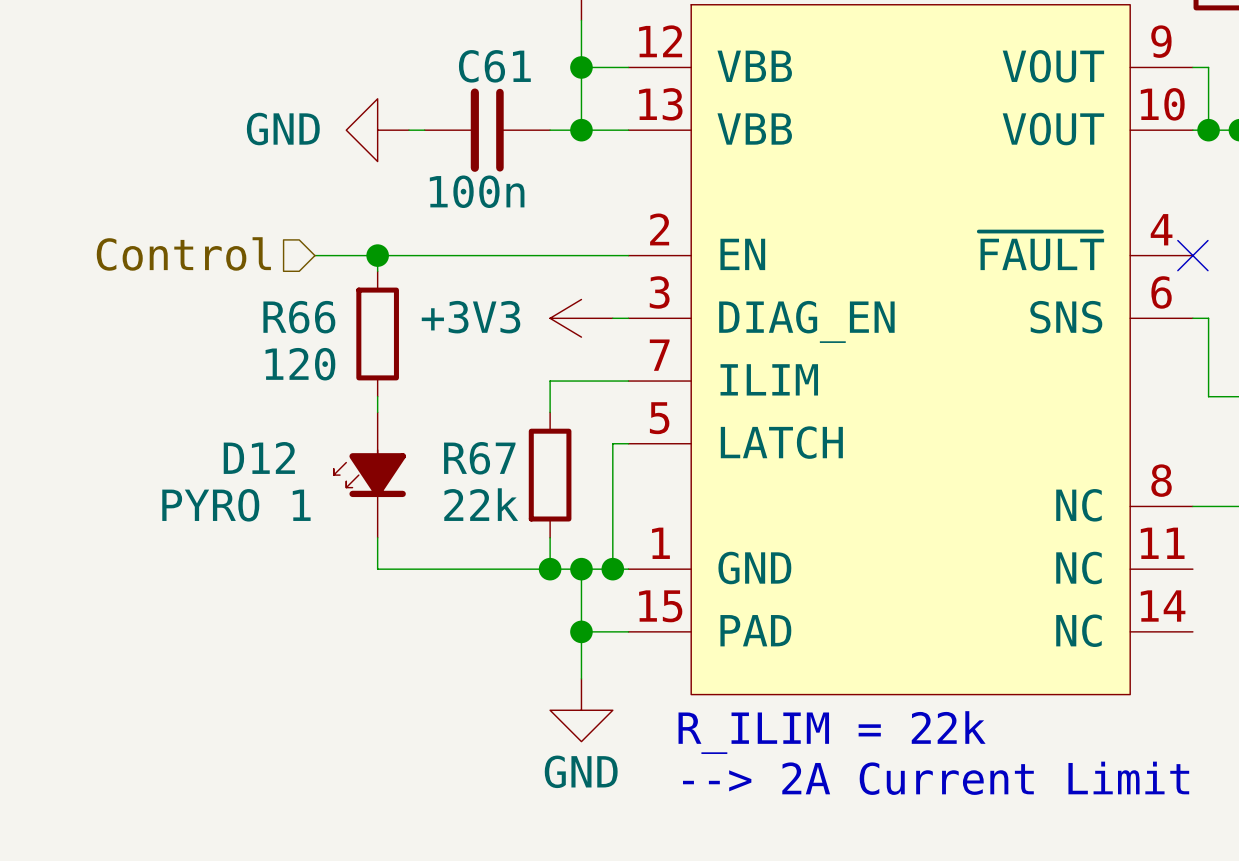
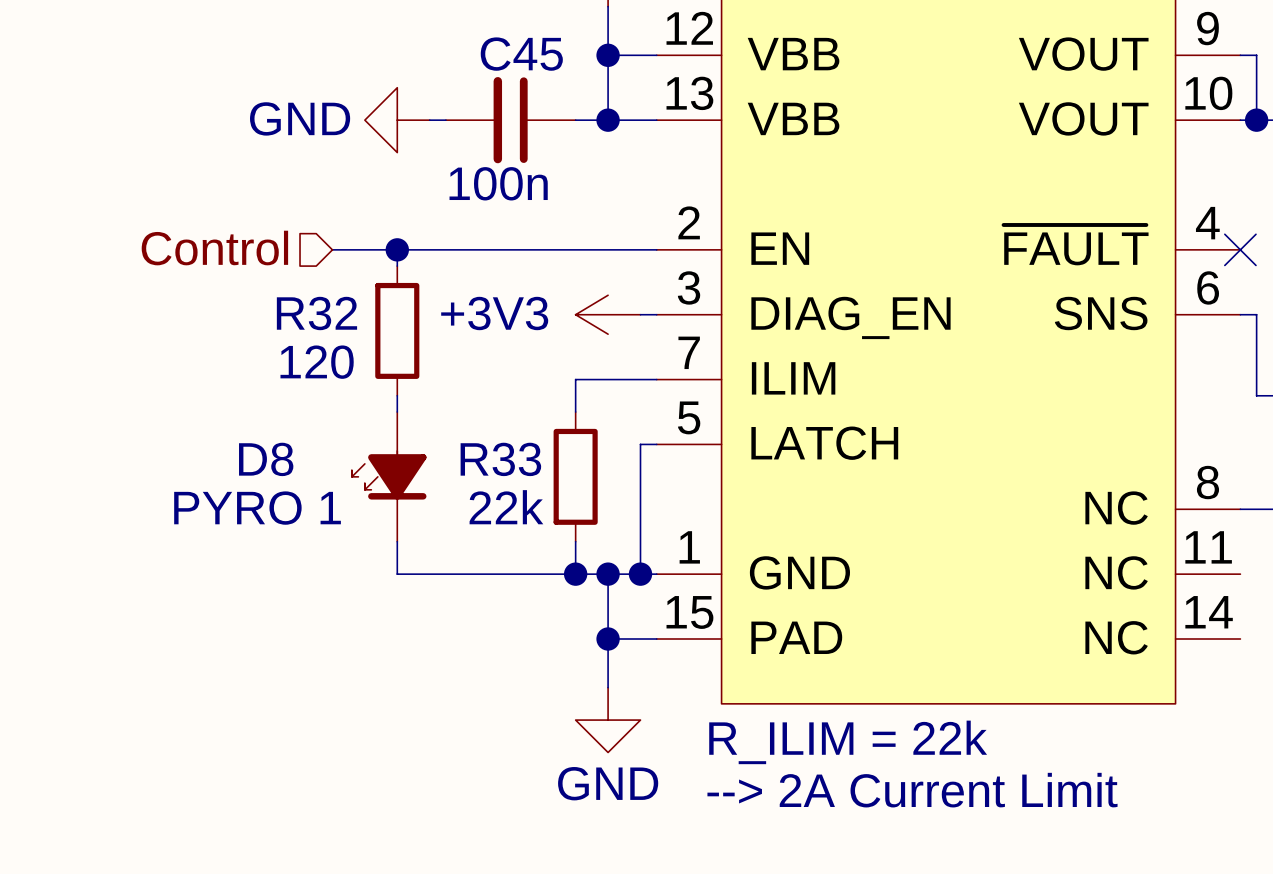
C61 name: C61 (494, 66) -> C45 (521, 54)
R66 name: R66 (299, 317) -> R32 (316, 313)
D12 name: D12 (259, 457) -> D8 (266, 459)
R67 name: R67 (479, 458) -> R33 (500, 459)

